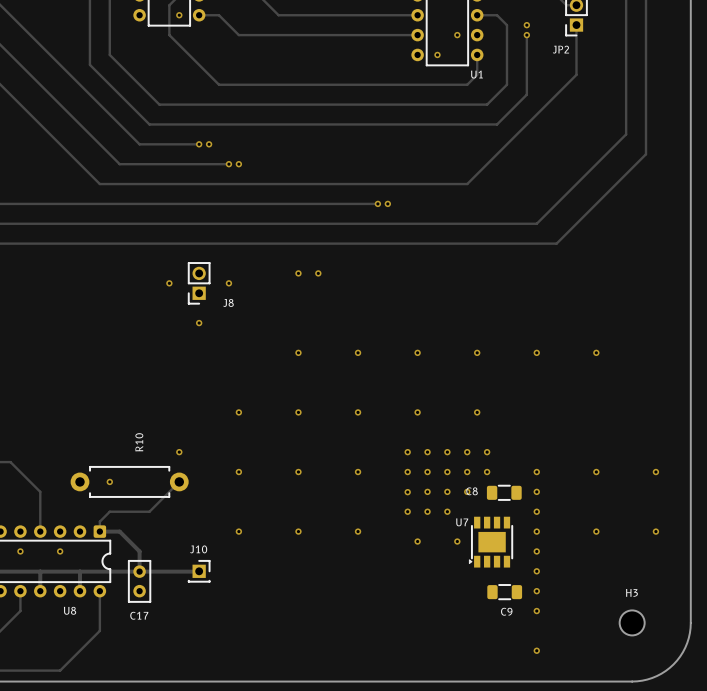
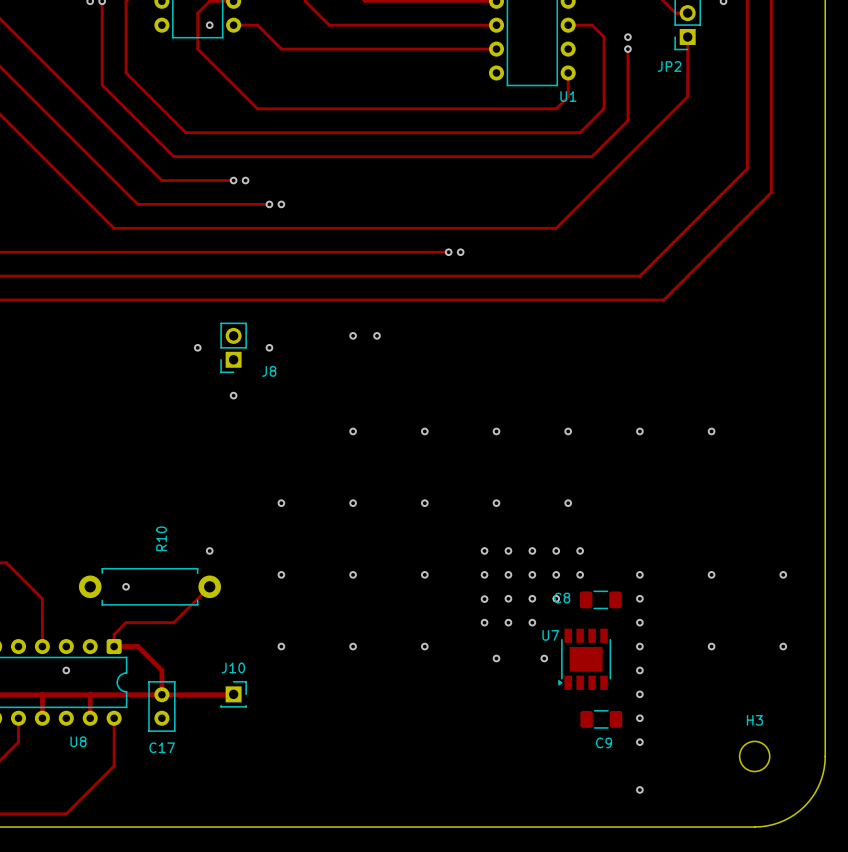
via: (457, 35) -> none
via: (437, 54) -> none
via: (20, 551) -> none

